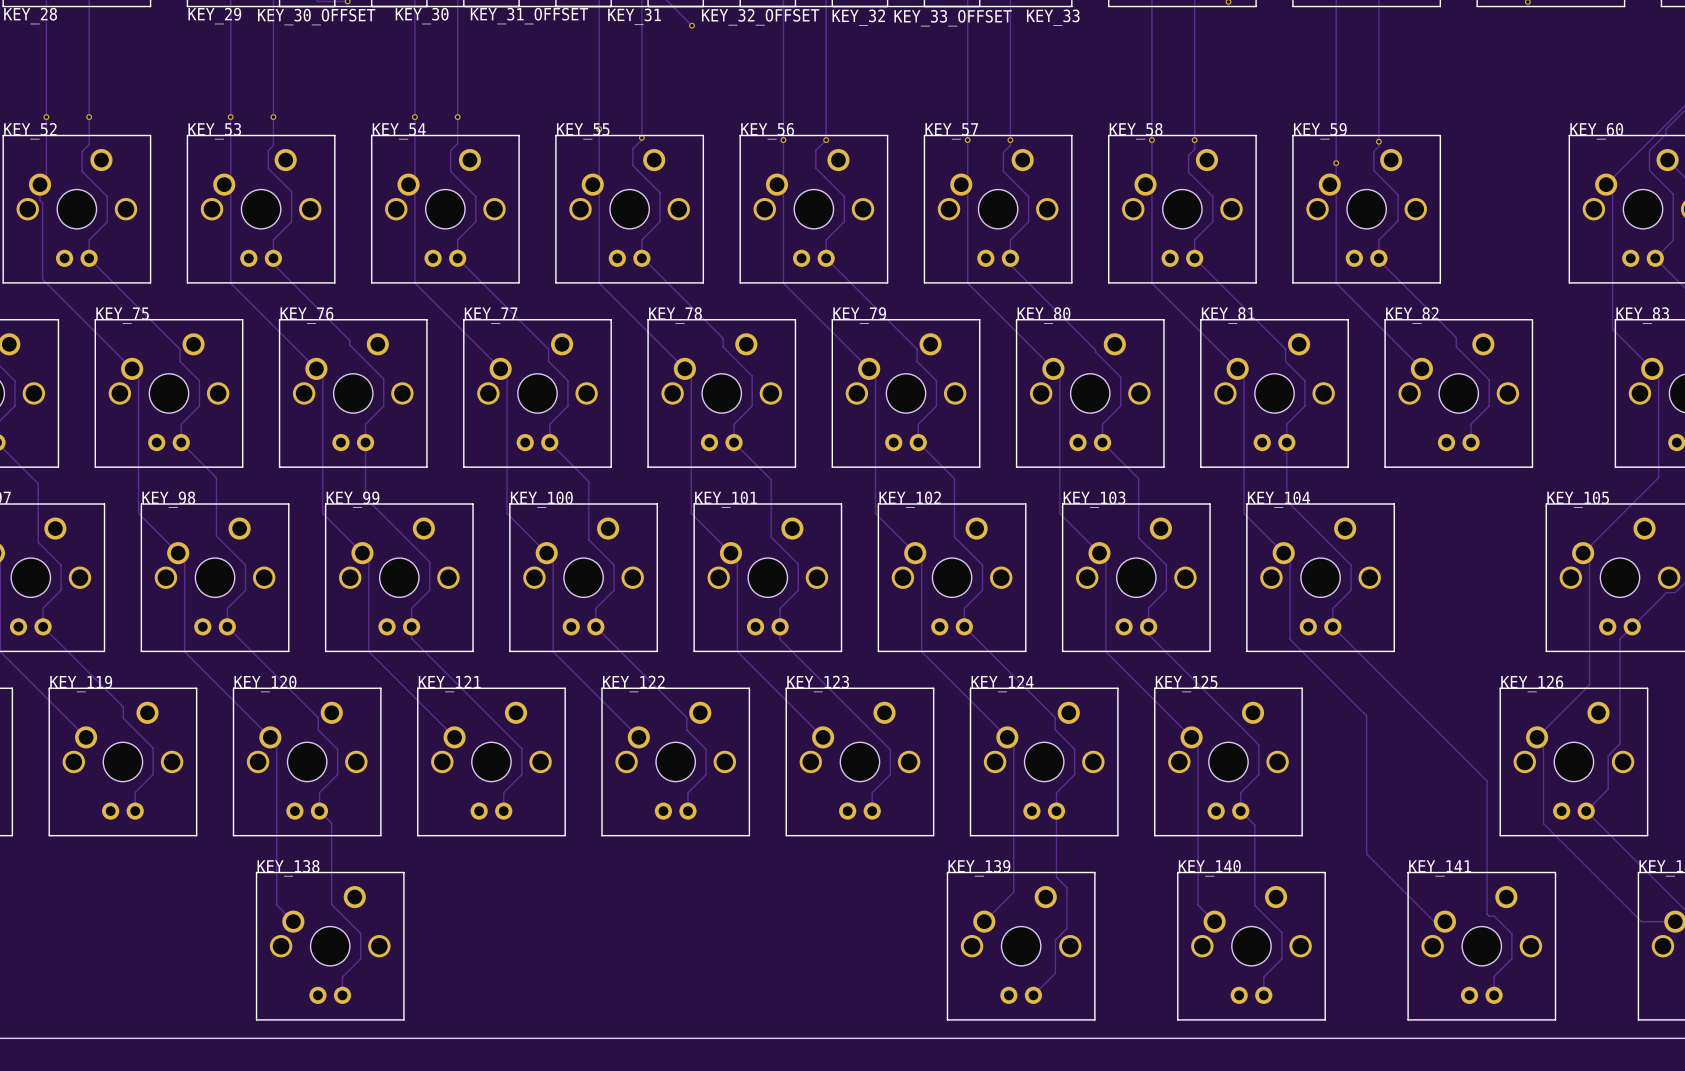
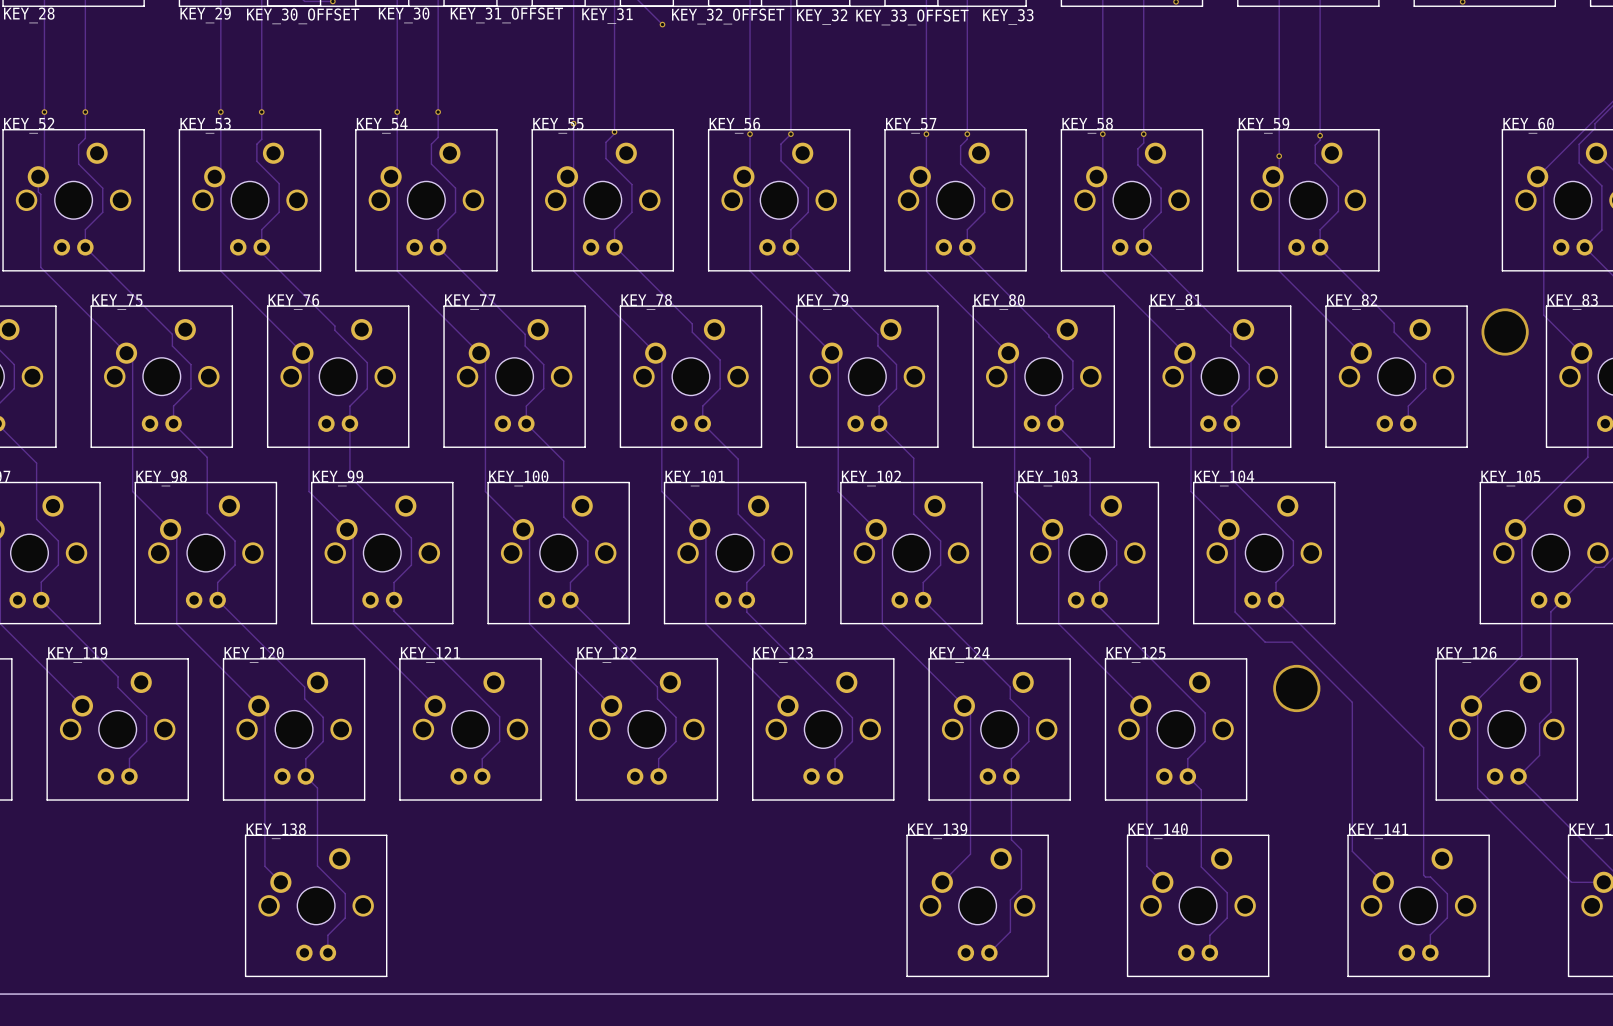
via: none -> (1505, 331)
track: (1321, 670) (1366, 715) (1366, 854) (1434, 921) (1444, 921) -> (1265, 642) (1292, 642) (1352, 702) (1352, 851) (1383, 882)
via: none -> (1296, 688)

